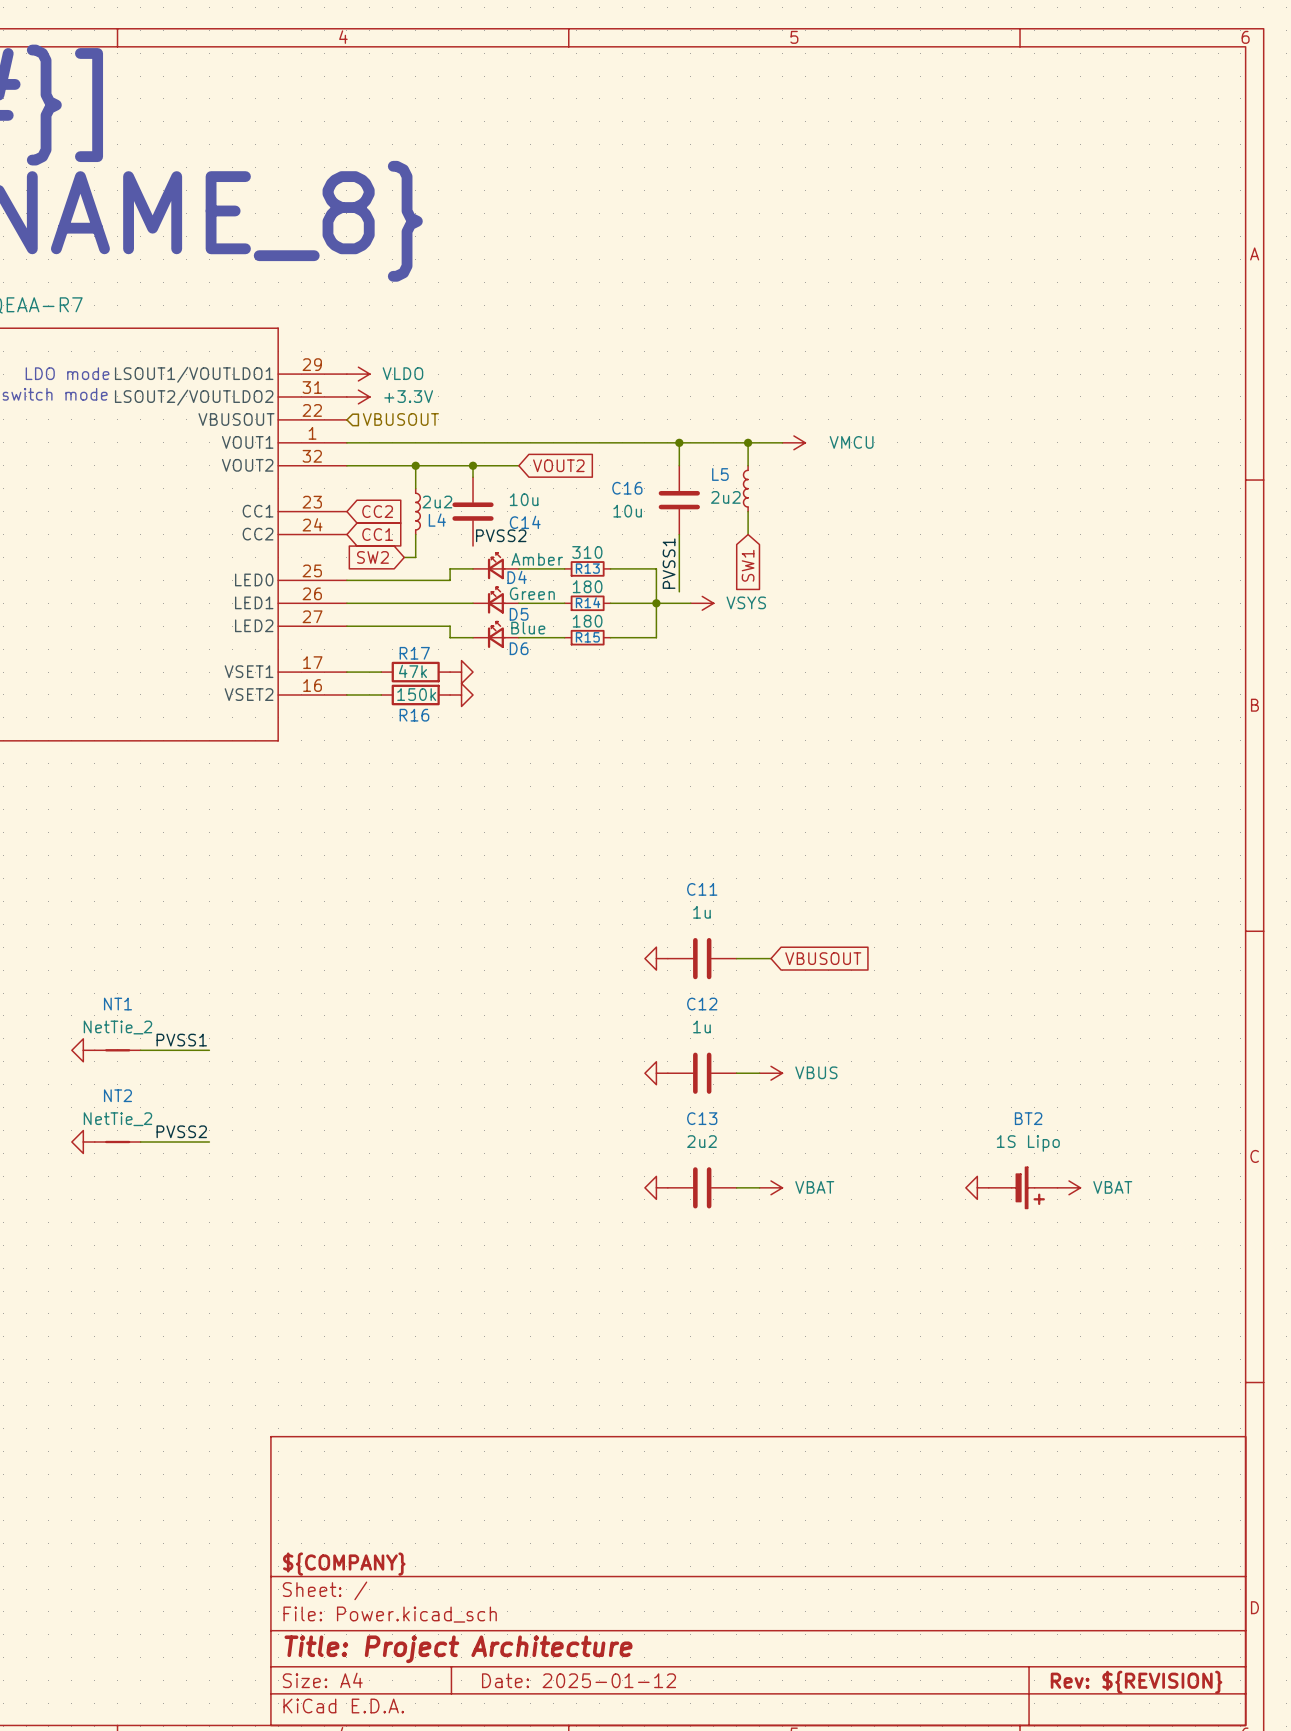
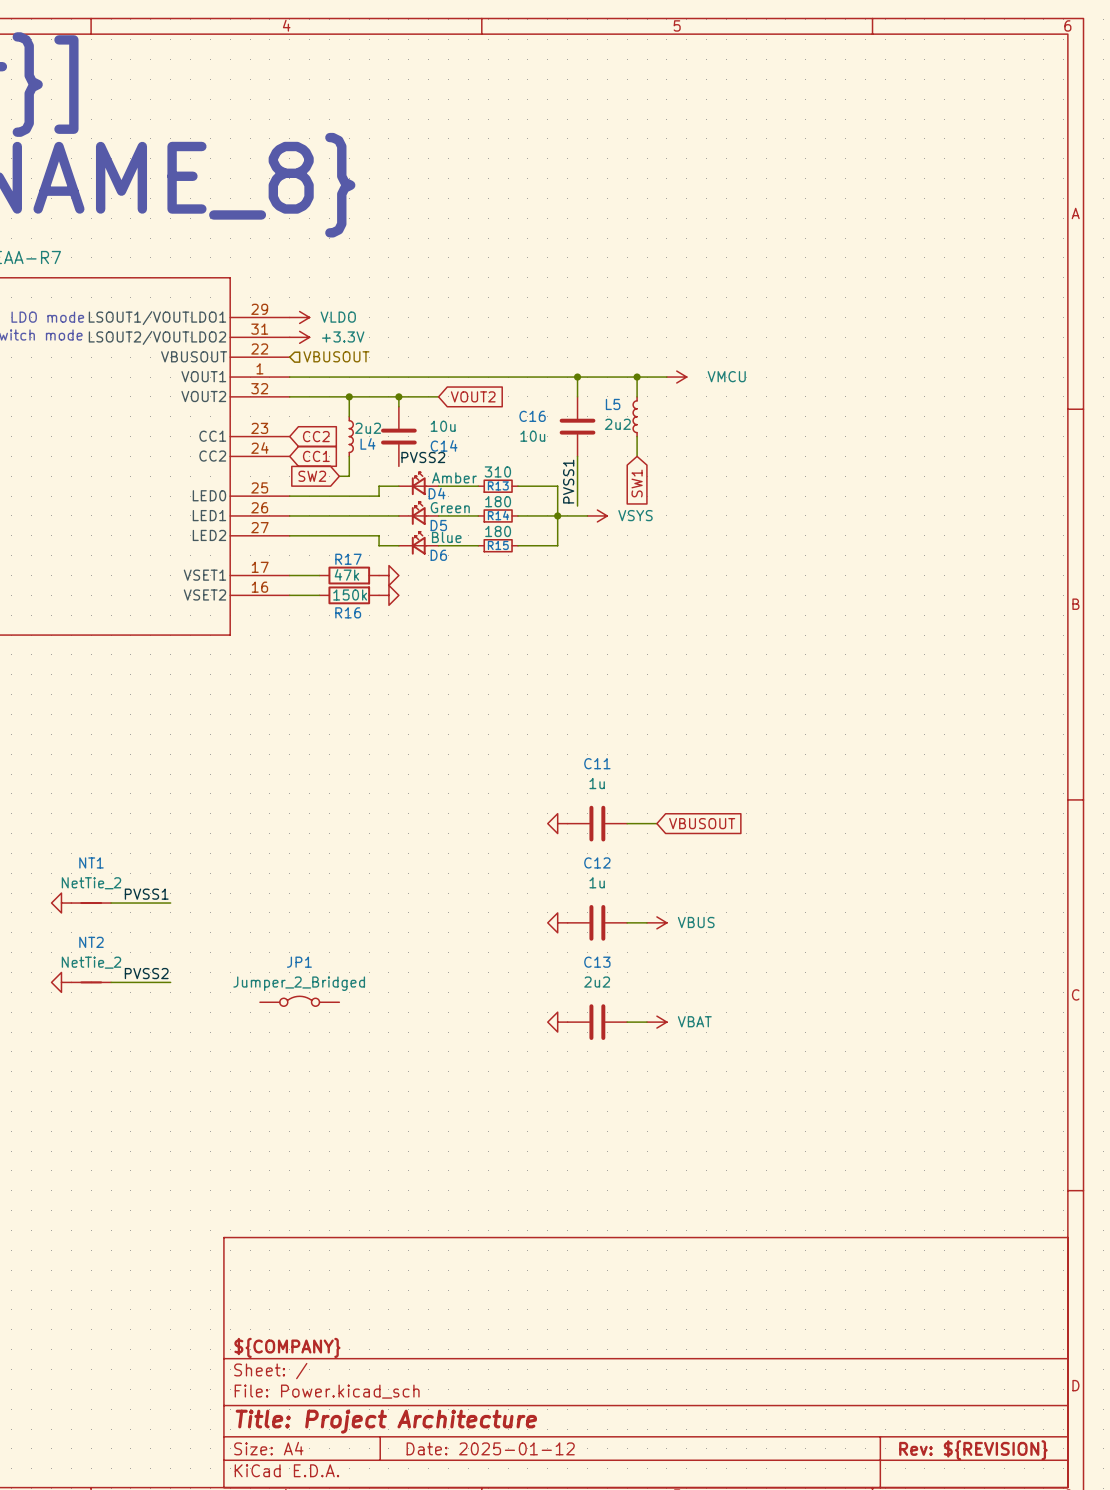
JP1: none -> Jumper_2_Bridged (299, 1001)
power symbol: (977, 1187) -> none
BT2: 1S Lipo (1023, 1187) -> none
power symbol: VBAT (1069, 1187) -> none

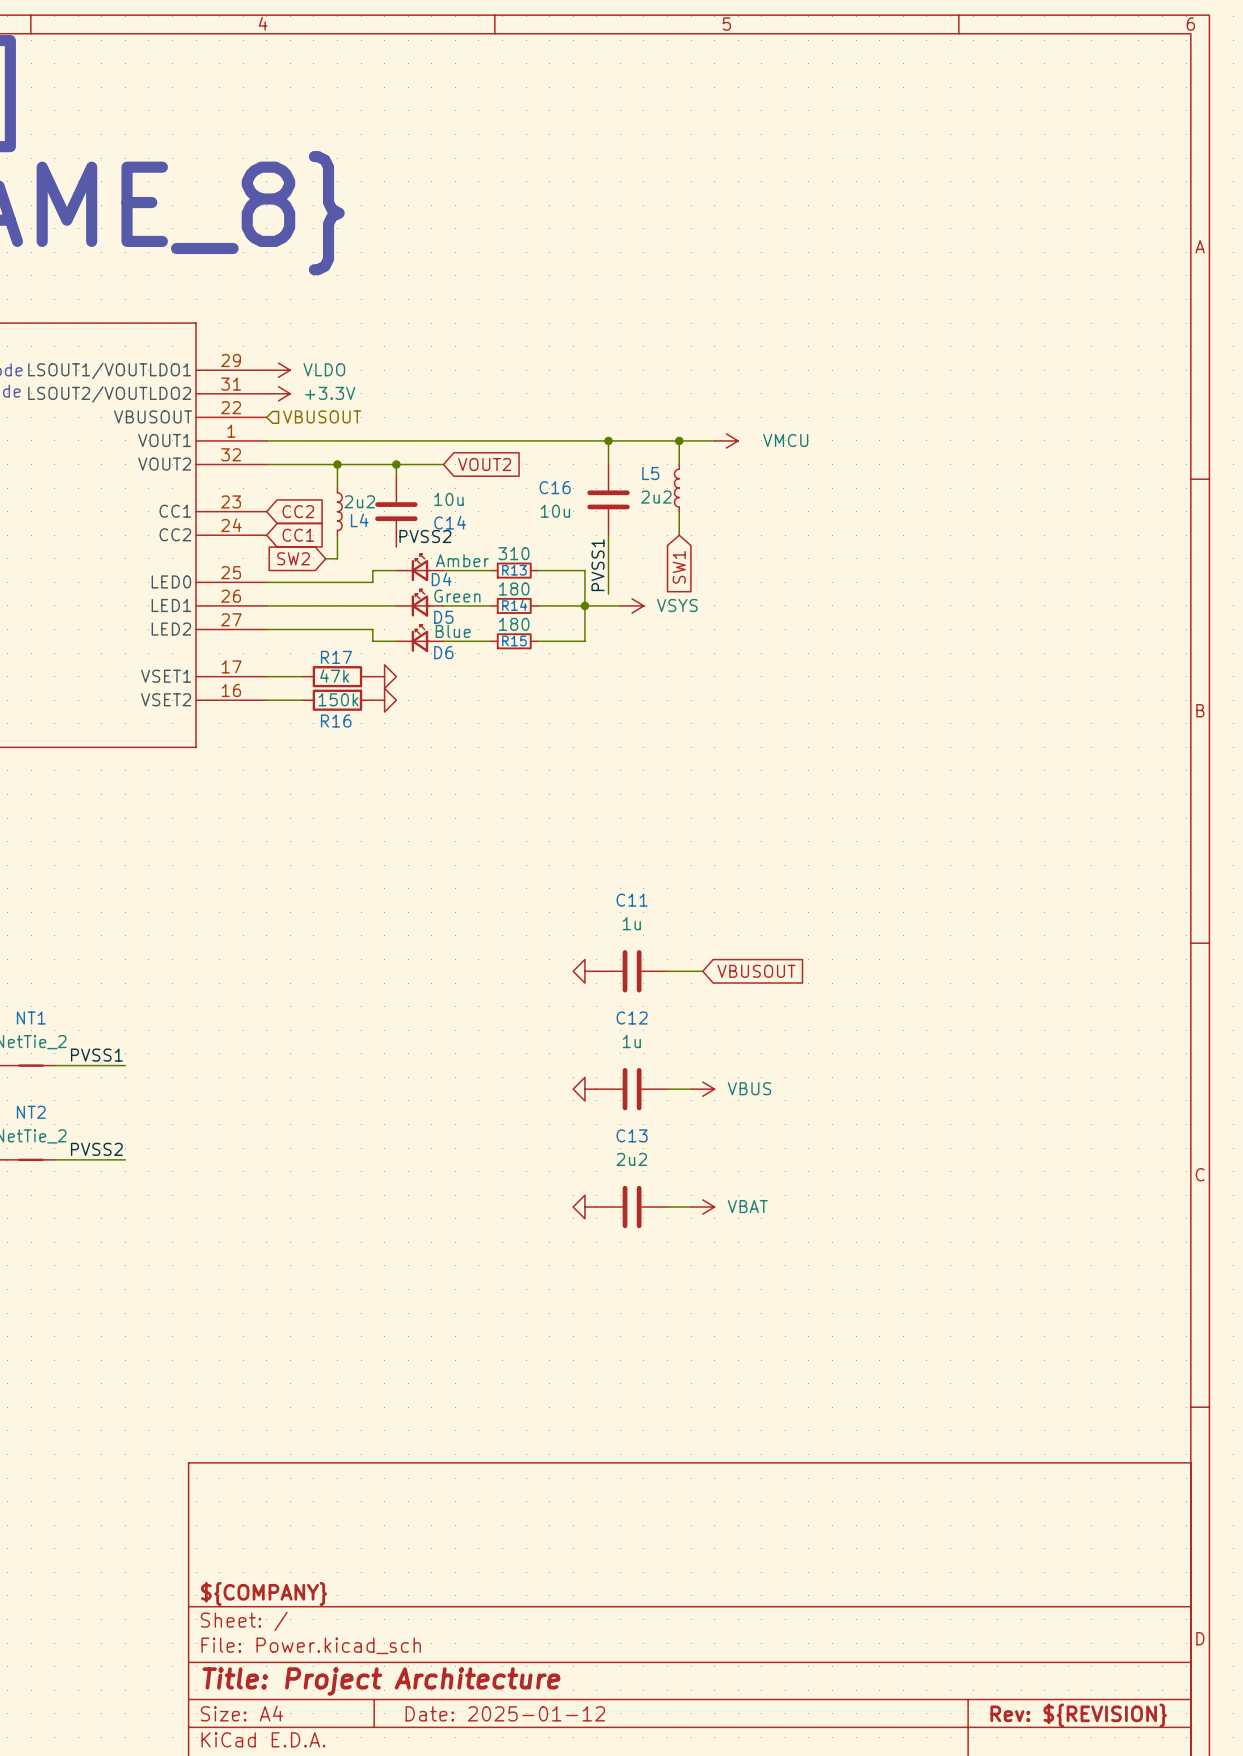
JP1: Jumper_2_Bridged (299, 1001) -> none

